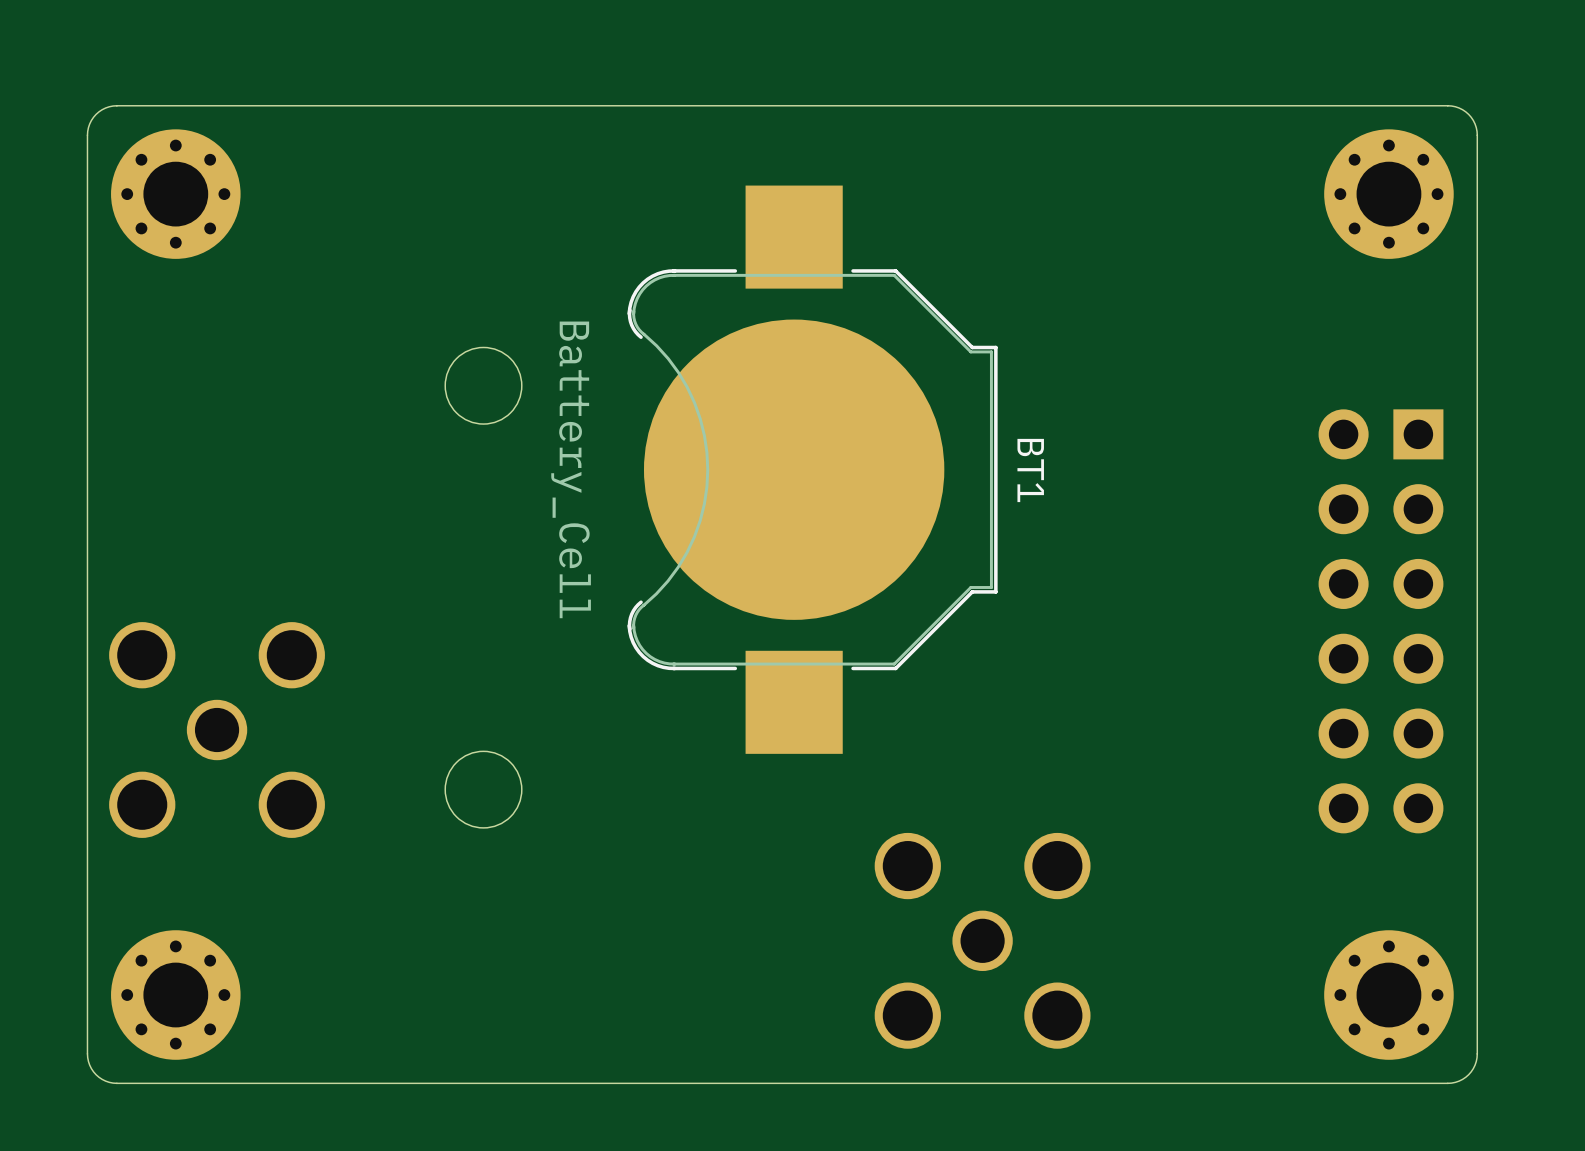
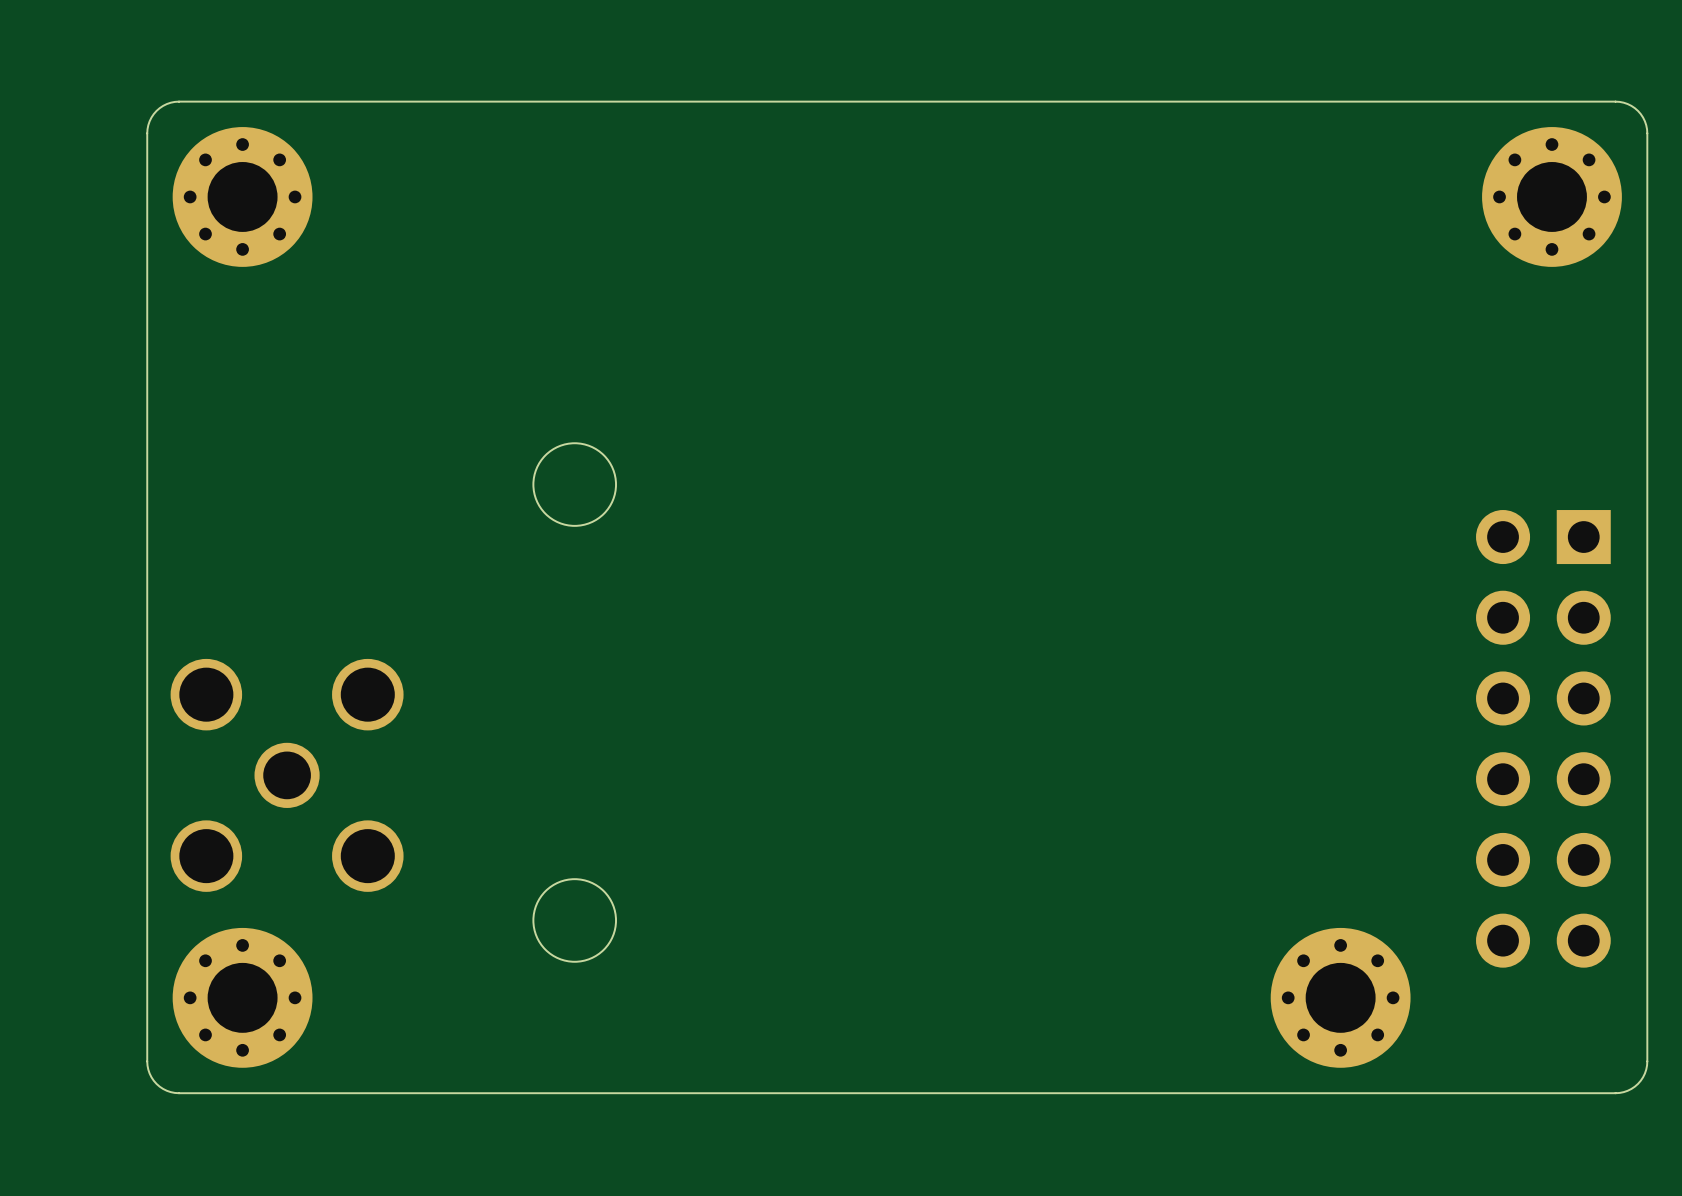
round board edge position: (483, 385) -> (574, 484)
BT1: Battery_Cell (812, 469) -> none
part position: (1381, 621) -> (1543, 738)
round board edge position: (483, 789) -> (574, 920)
part: (982, 940) -> none
part position: (175, 995) -> (242, 997)
part position: (1388, 995) -> (1340, 997)
board edge: (1477, 995) (1476, 1061) (1465, 1077) (1447, 1083) (116, 1083) (98, 1077) (88, 1061) (87, 995) -> (1647, 1061) (1644, 1073) (1638, 1083) (1627, 1090) (1615, 1093) (179, 1093) (166, 1090) (156, 1083) (149, 1073) (147, 1061)

